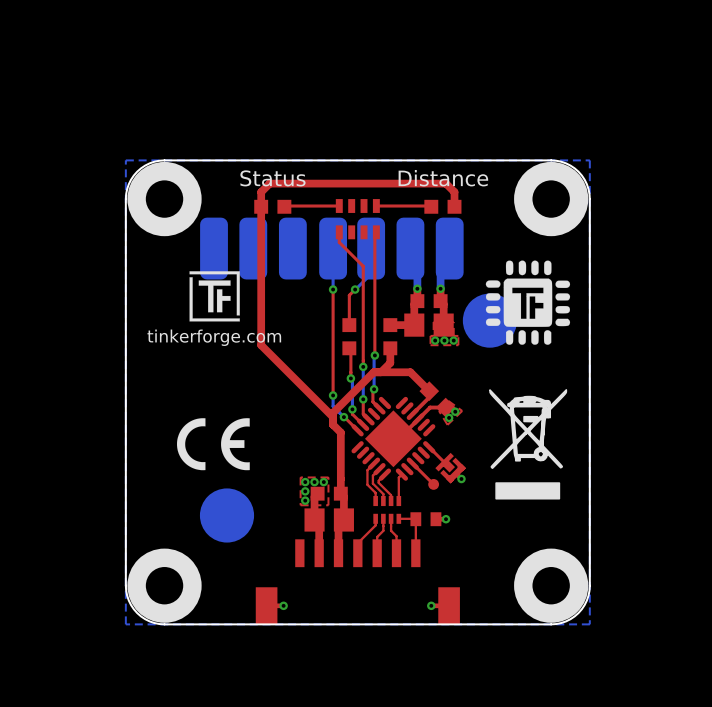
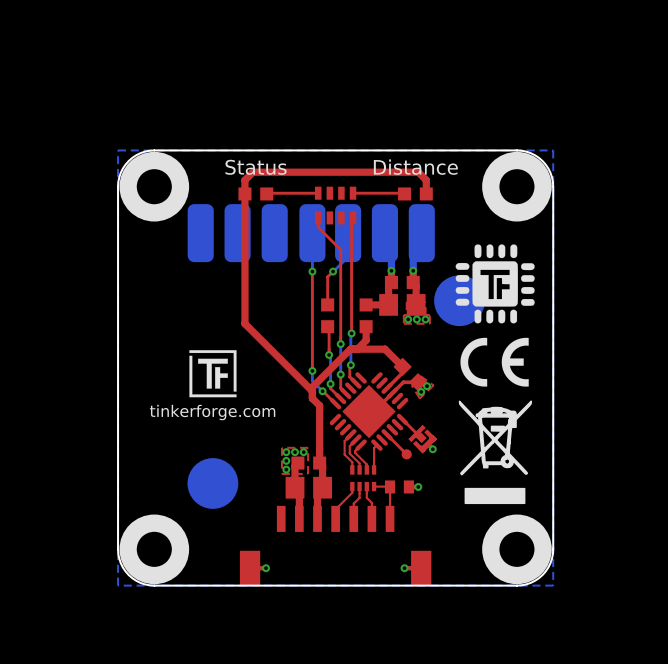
drawing position: (214, 296) -> (212, 373)
text position: tinkerforge.com (214, 337) -> tinkerforge.com (212, 412)
drawing position: (213, 444) -> (494, 362)
drawing position: (528, 444) -> (495, 452)

